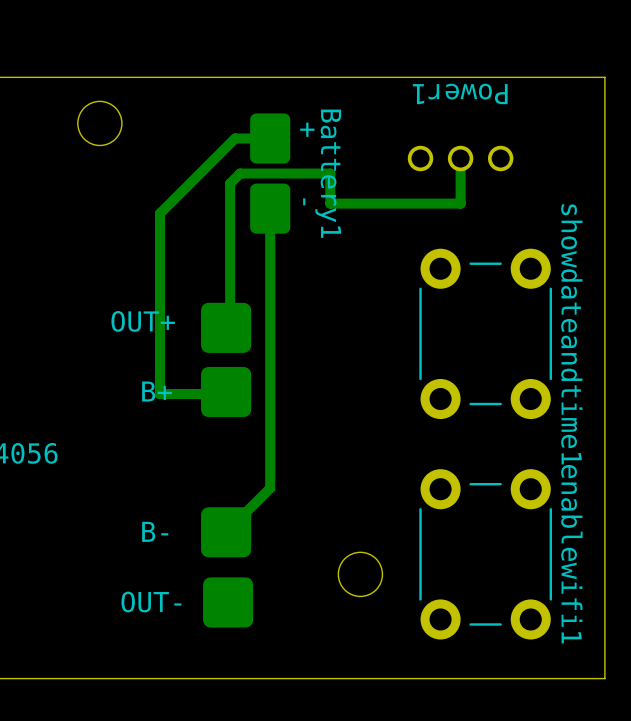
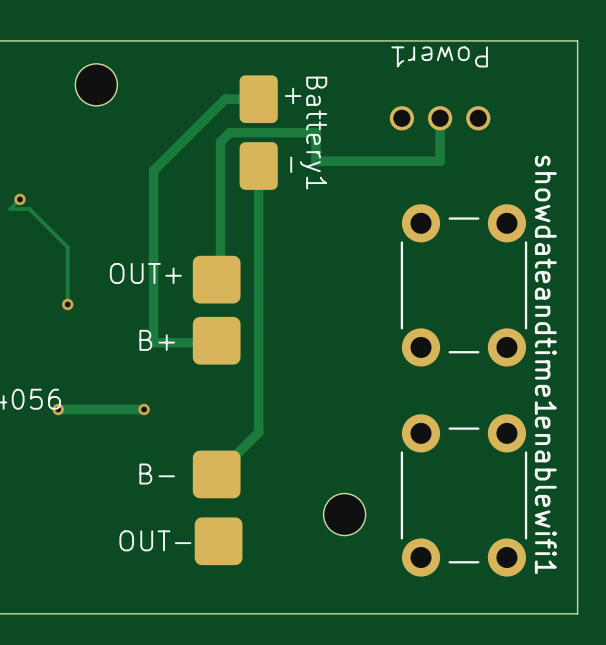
track: none -> (19, 199) (10, 208) (29, 208) (67, 247) (67, 304)
via: none -> (19, 199)
via: none -> (67, 304)
via: none -> (58, 409)
track: none -> (144, 409) (58, 409)
via: none -> (144, 409)

